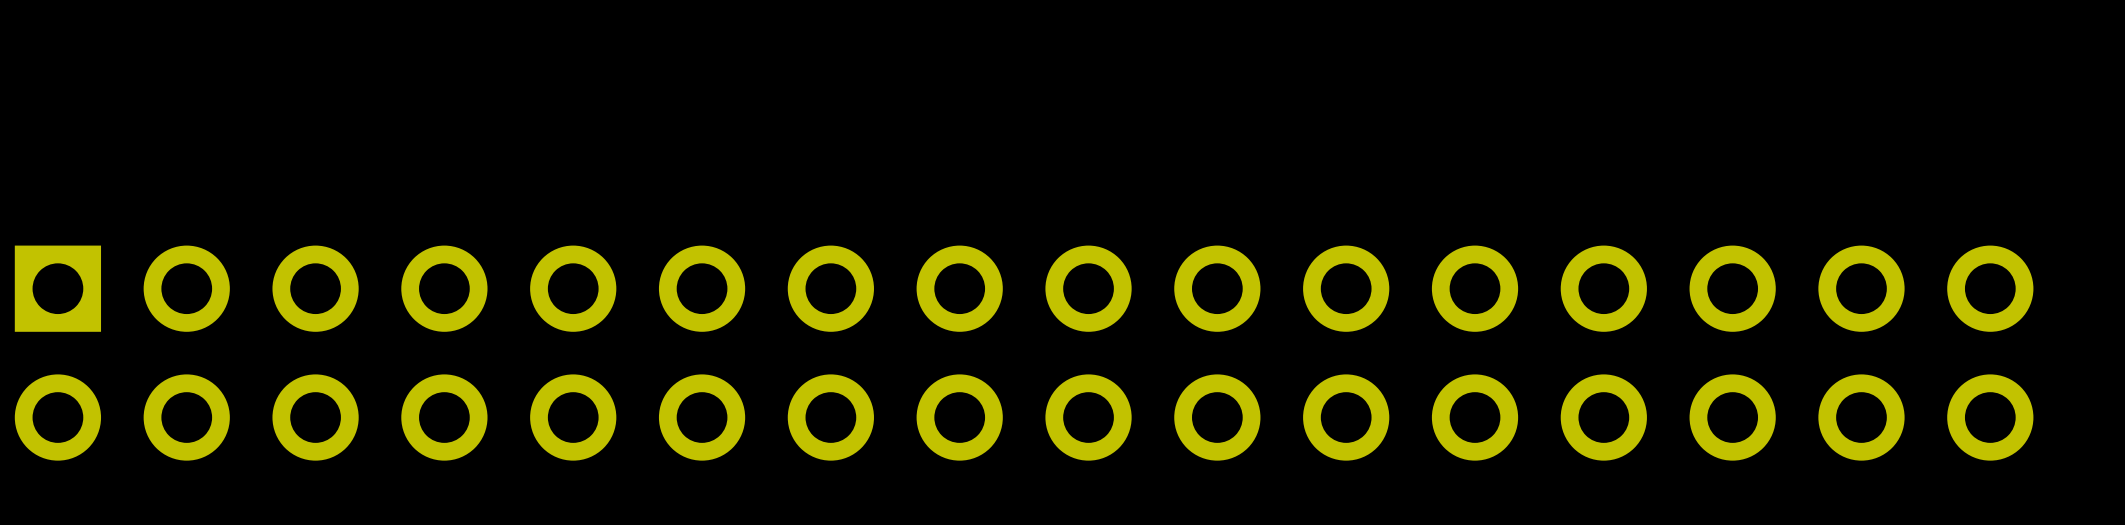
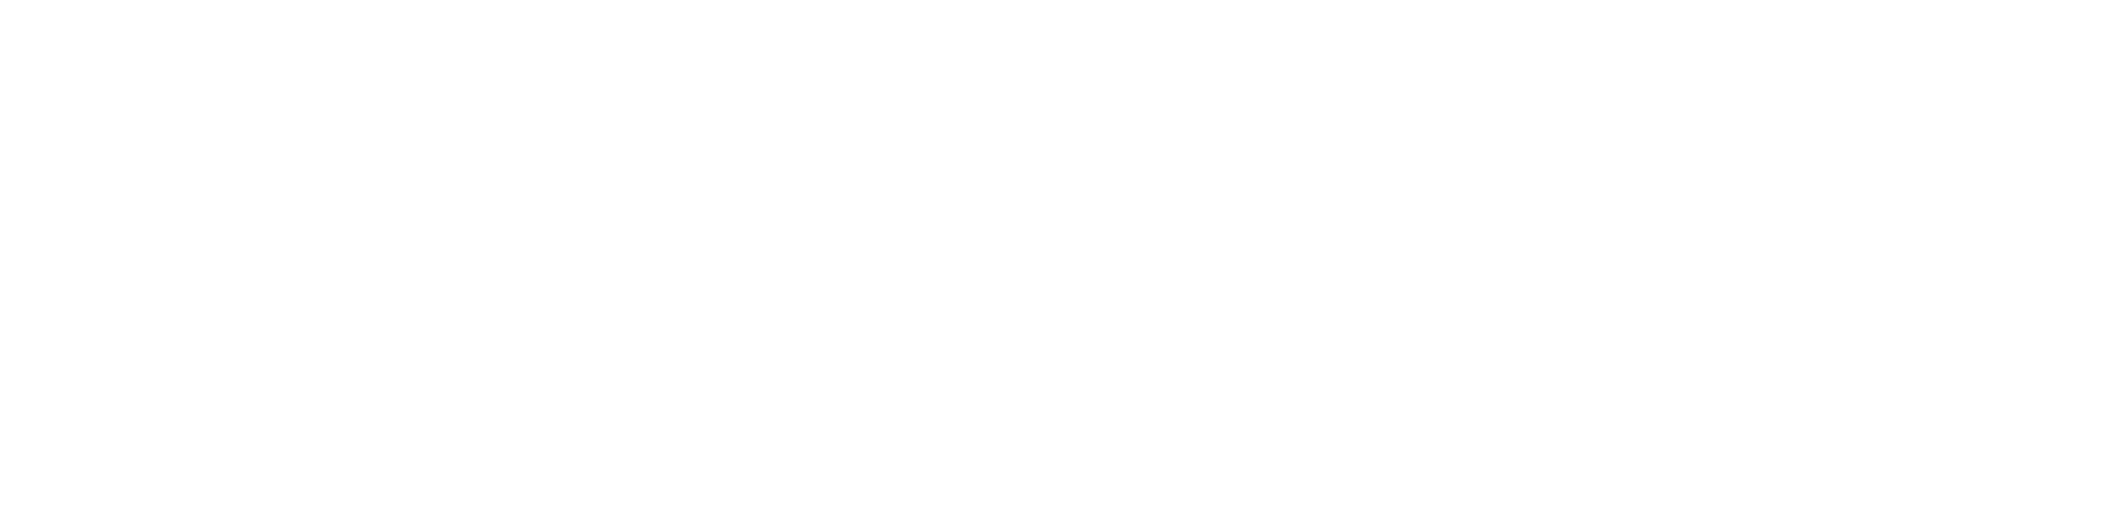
part: (1024, 353) -> none

